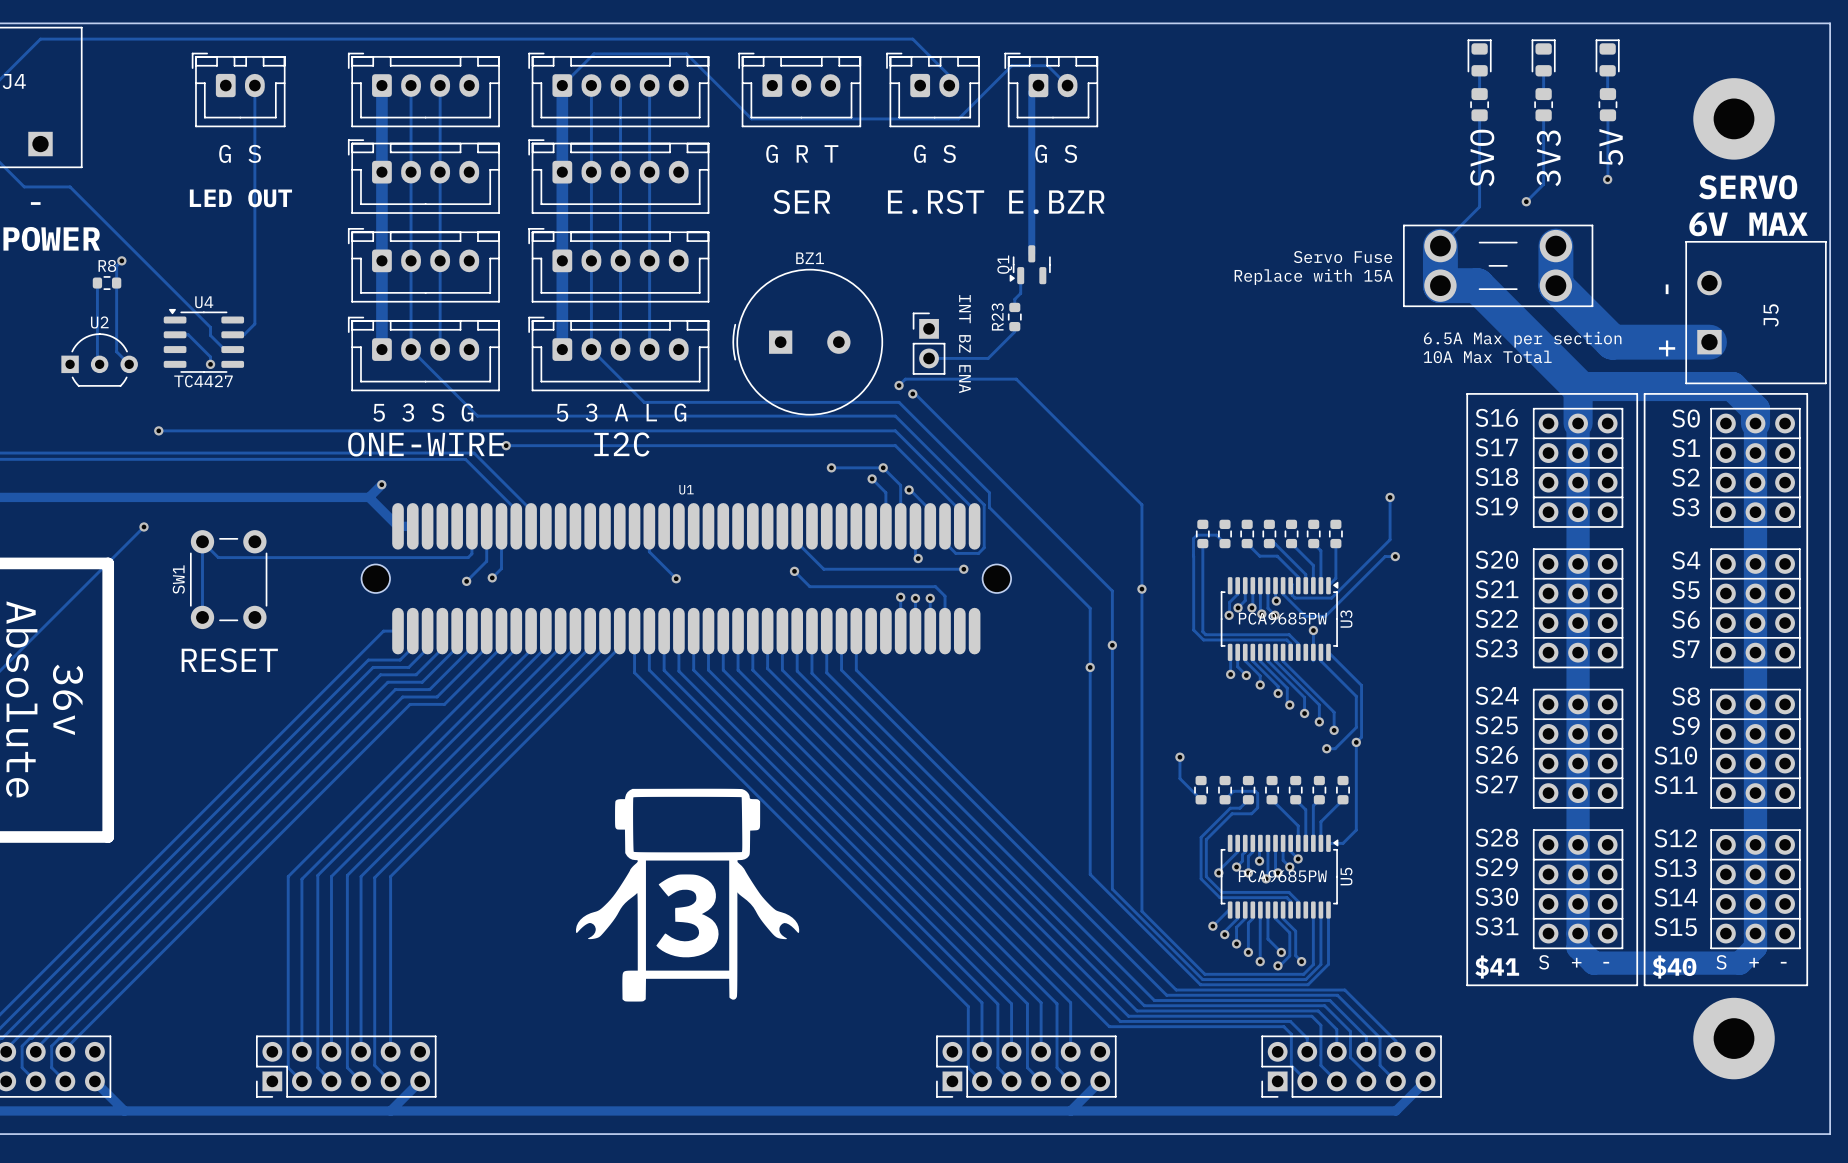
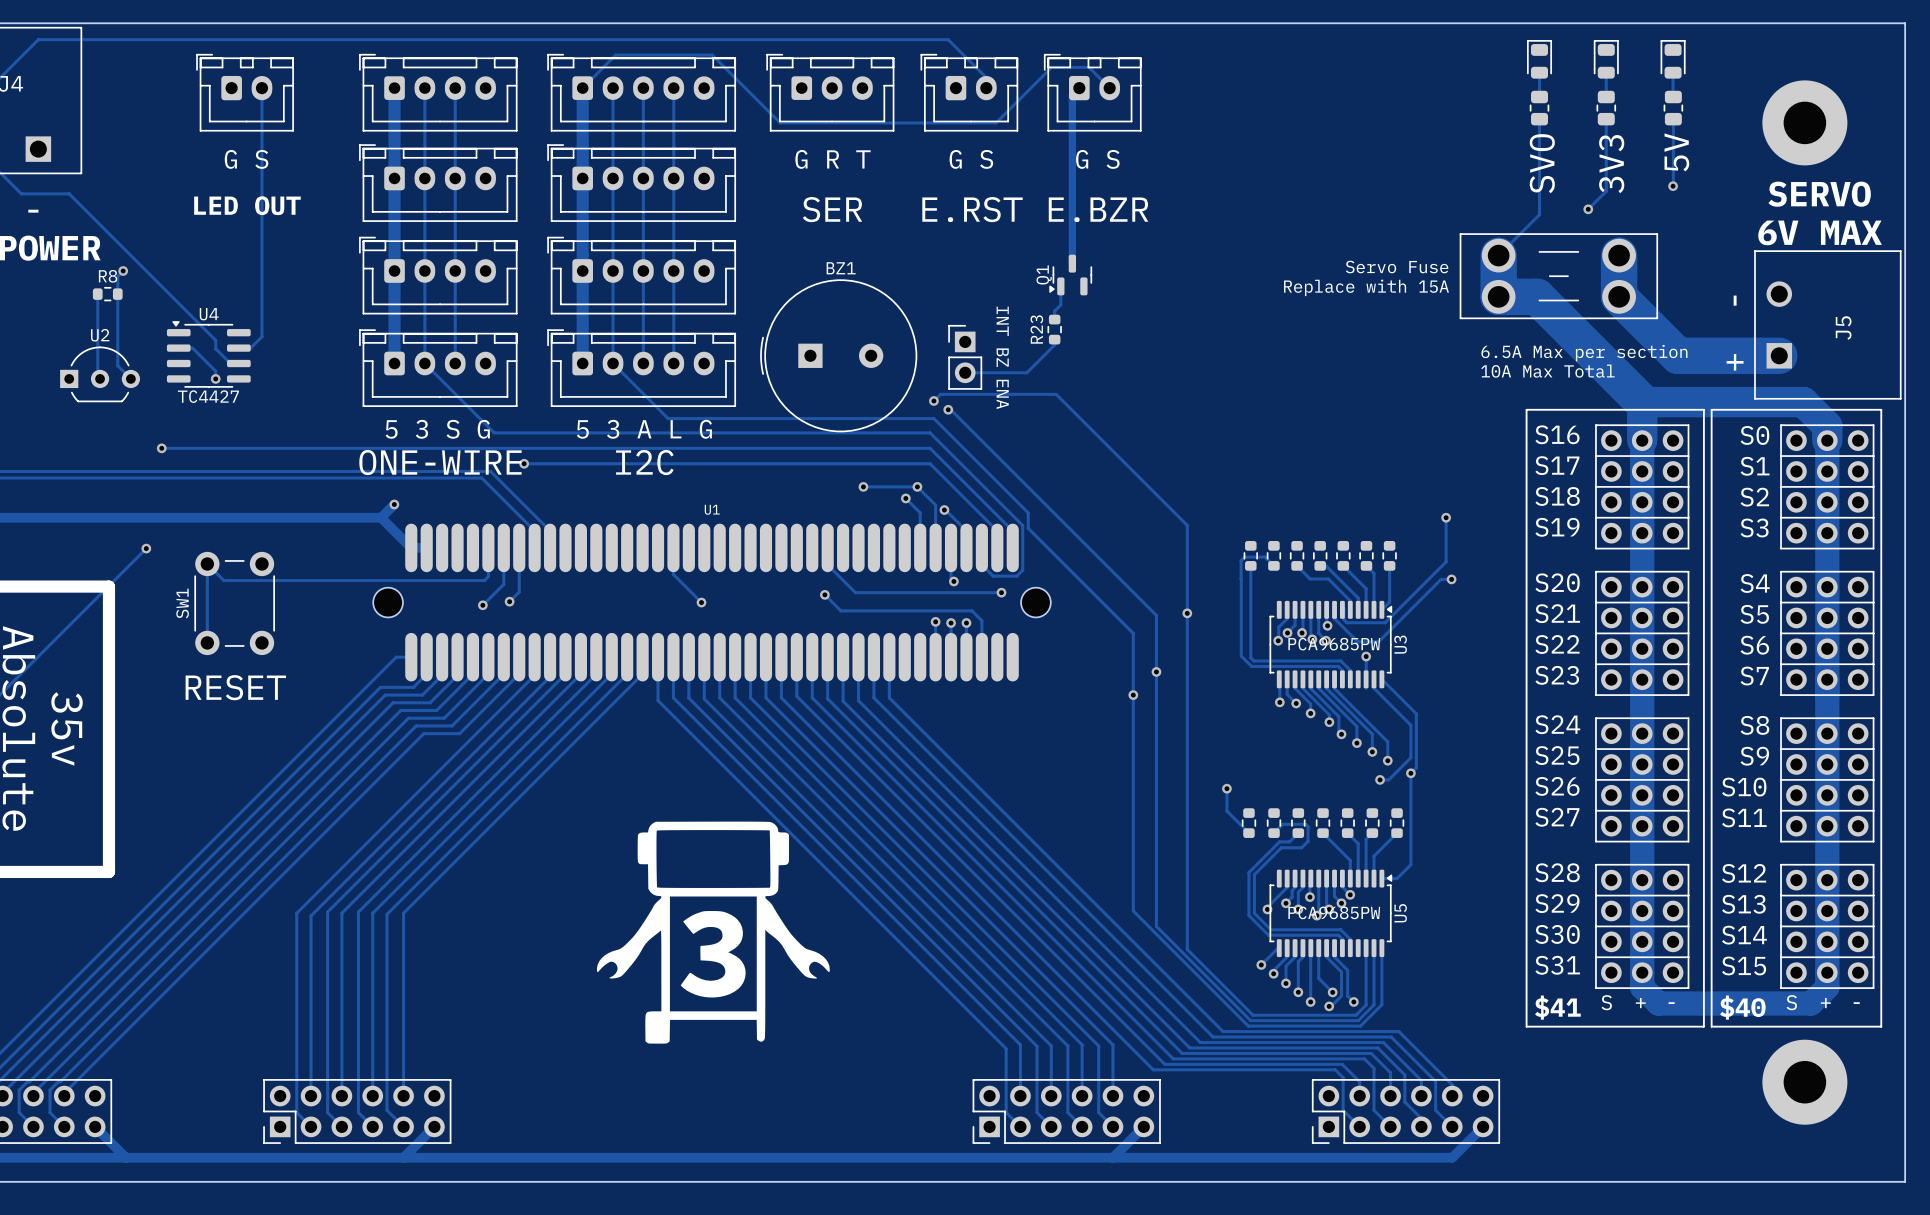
text: 36v (67, 699) -> 35v (67, 728)

